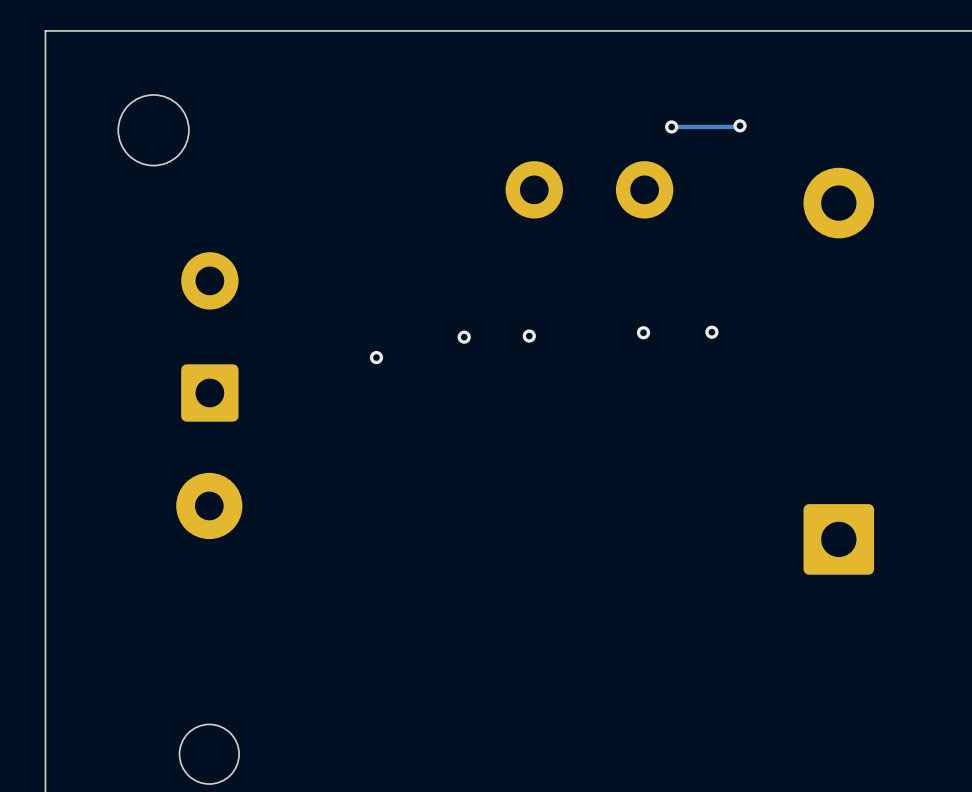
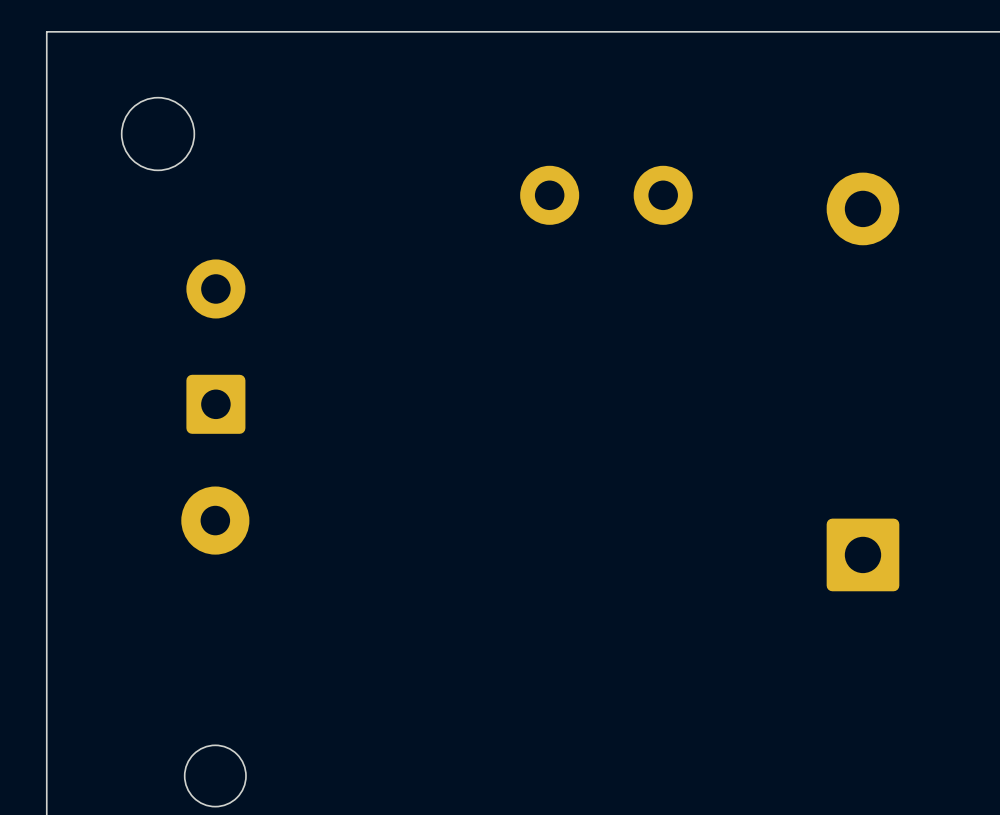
track: (740, 125) (671, 126) -> none
via: (740, 125) -> none
via: (671, 126) -> none
via: (643, 332) -> none
via: (711, 332) -> none
via: (529, 336) -> none
via: (464, 337) -> none
via: (376, 357) -> none

